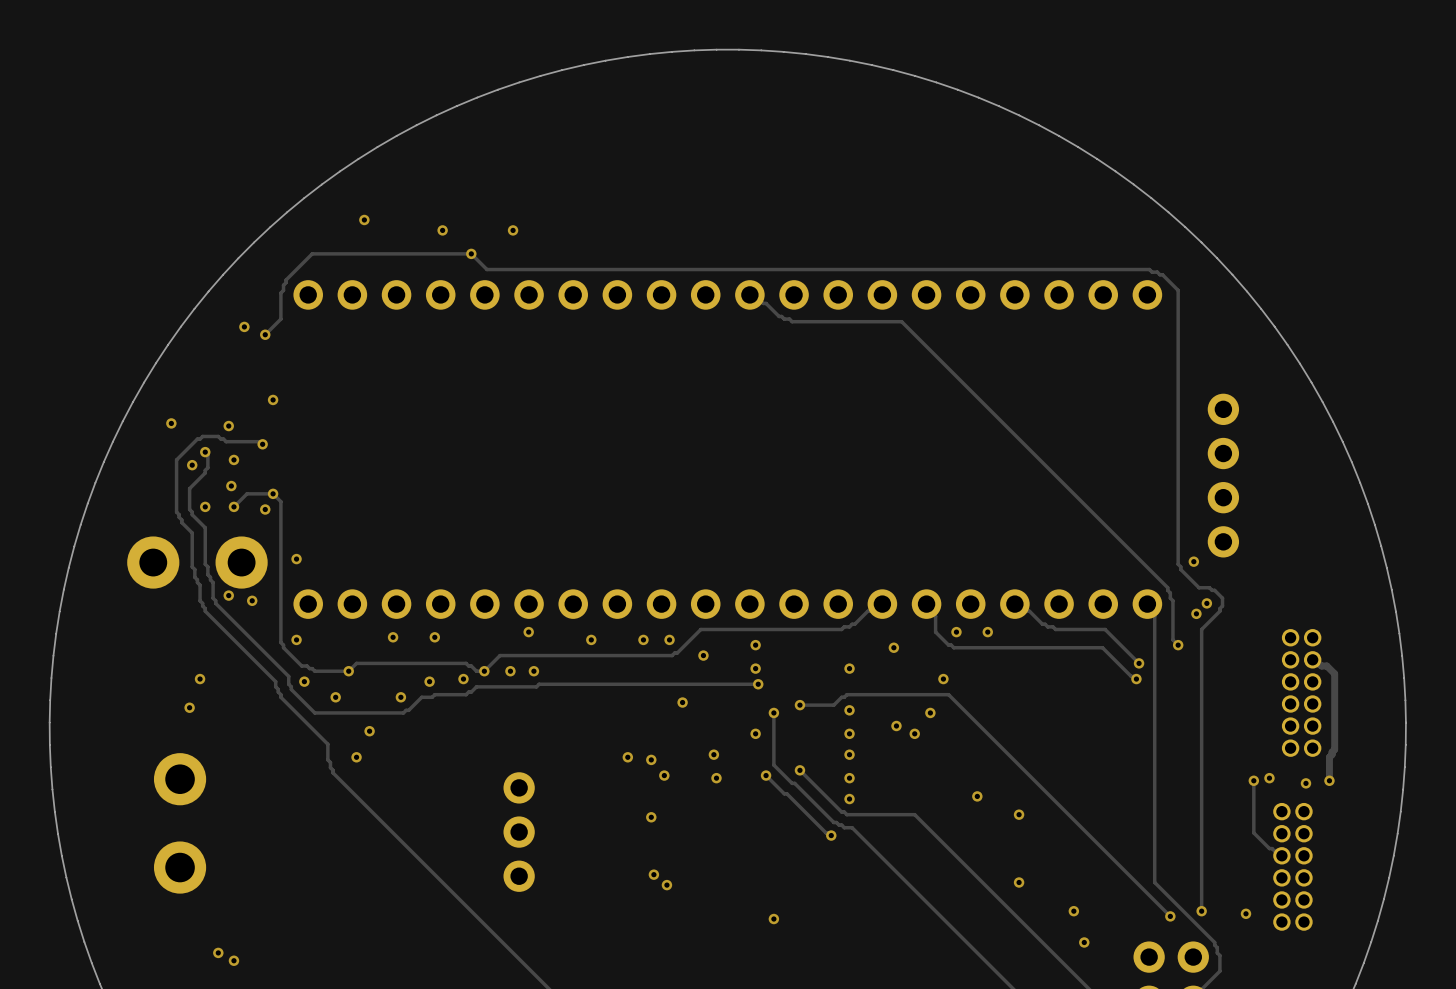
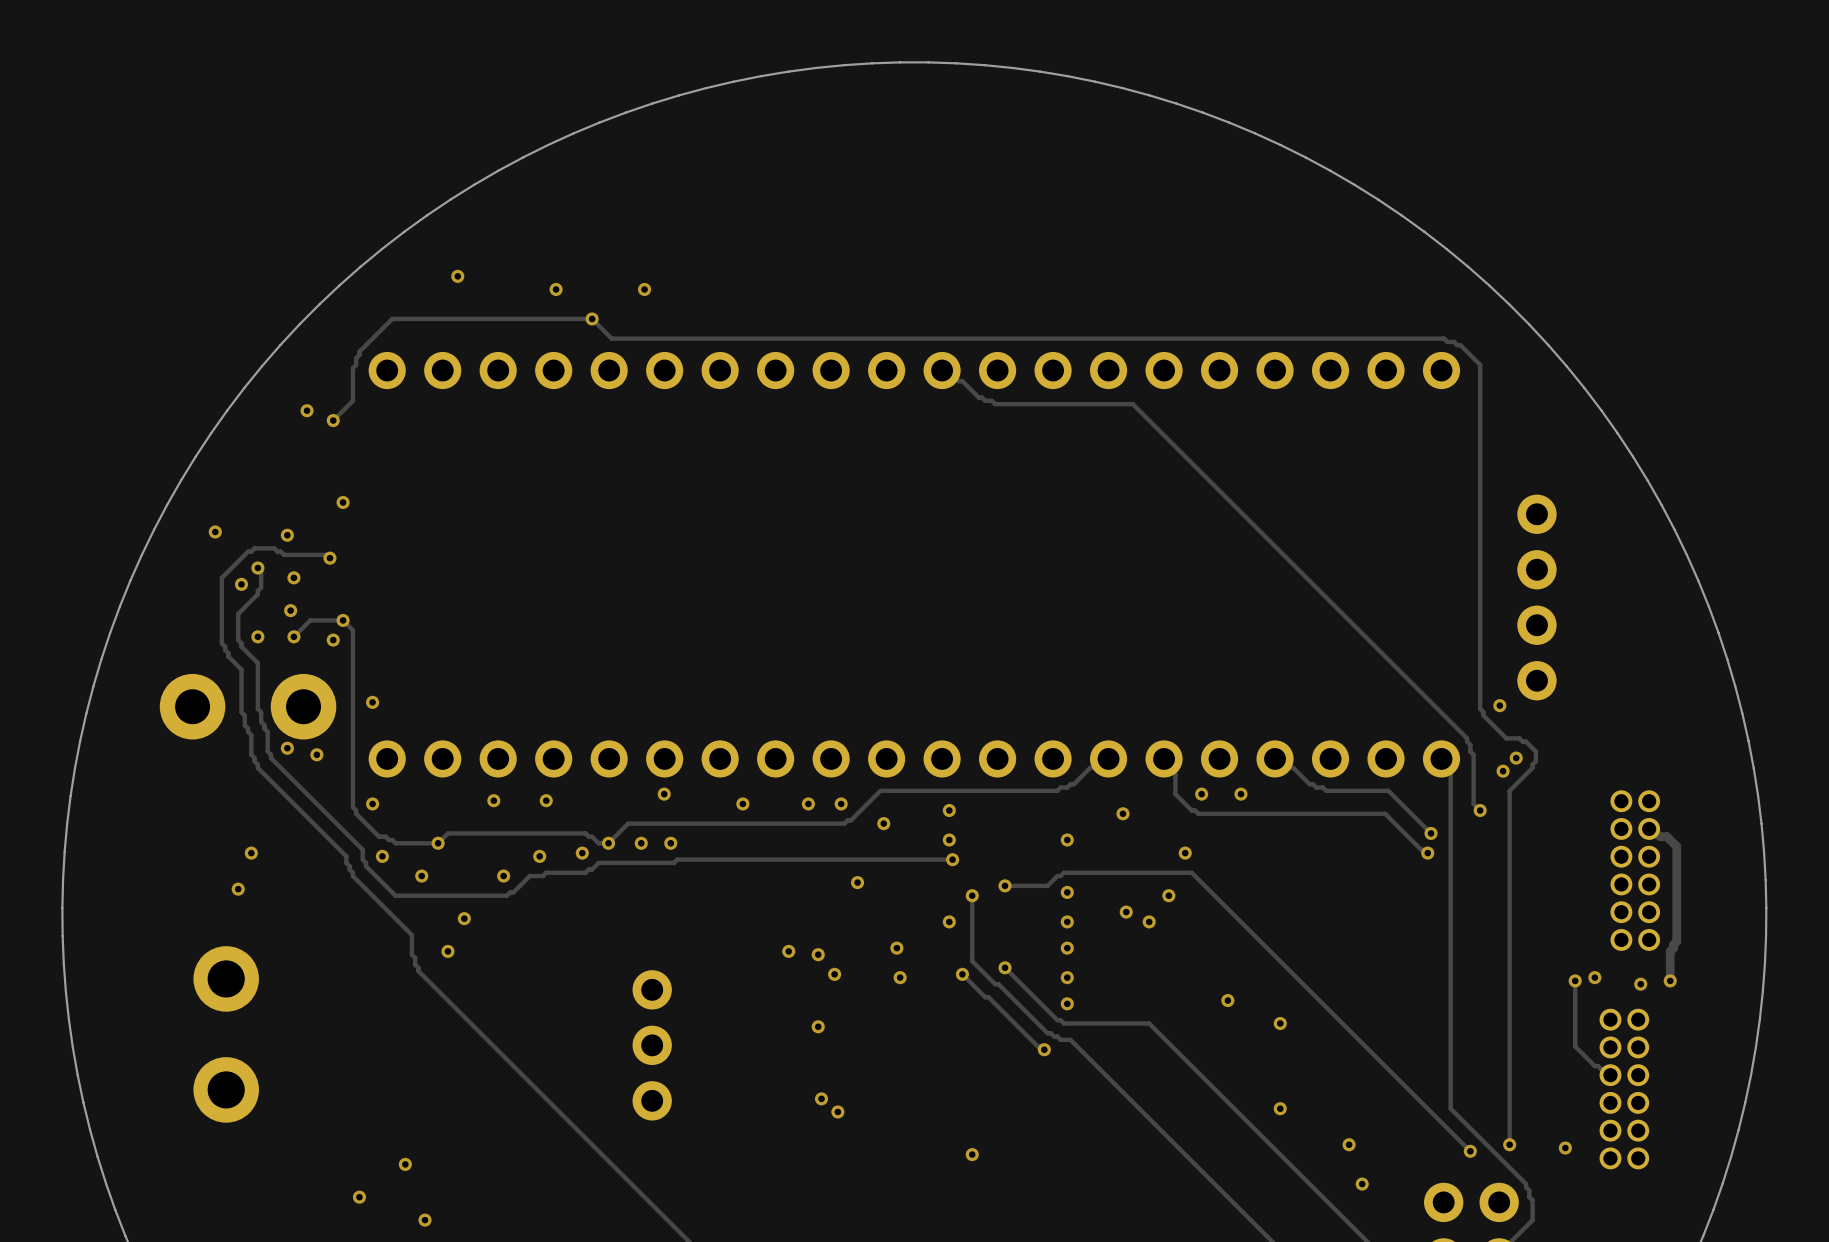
via: none -> (405, 1164)
via: (218, 952) -> none
via: none -> (359, 1197)
via: (233, 960) -> none
via: none -> (425, 1220)

